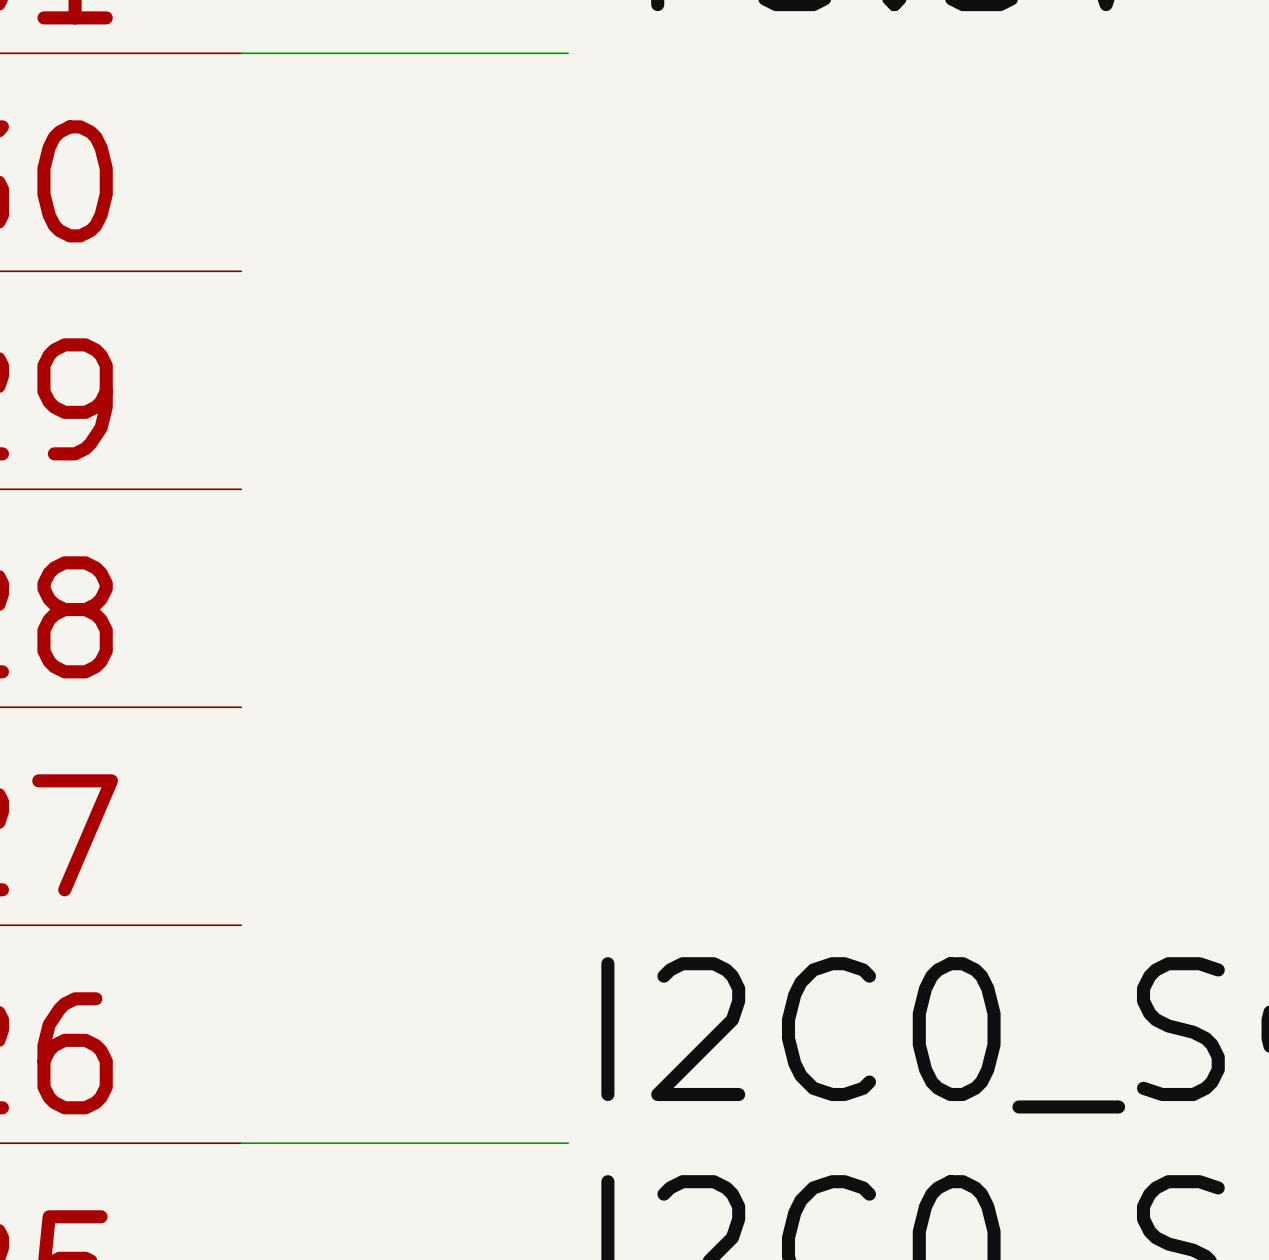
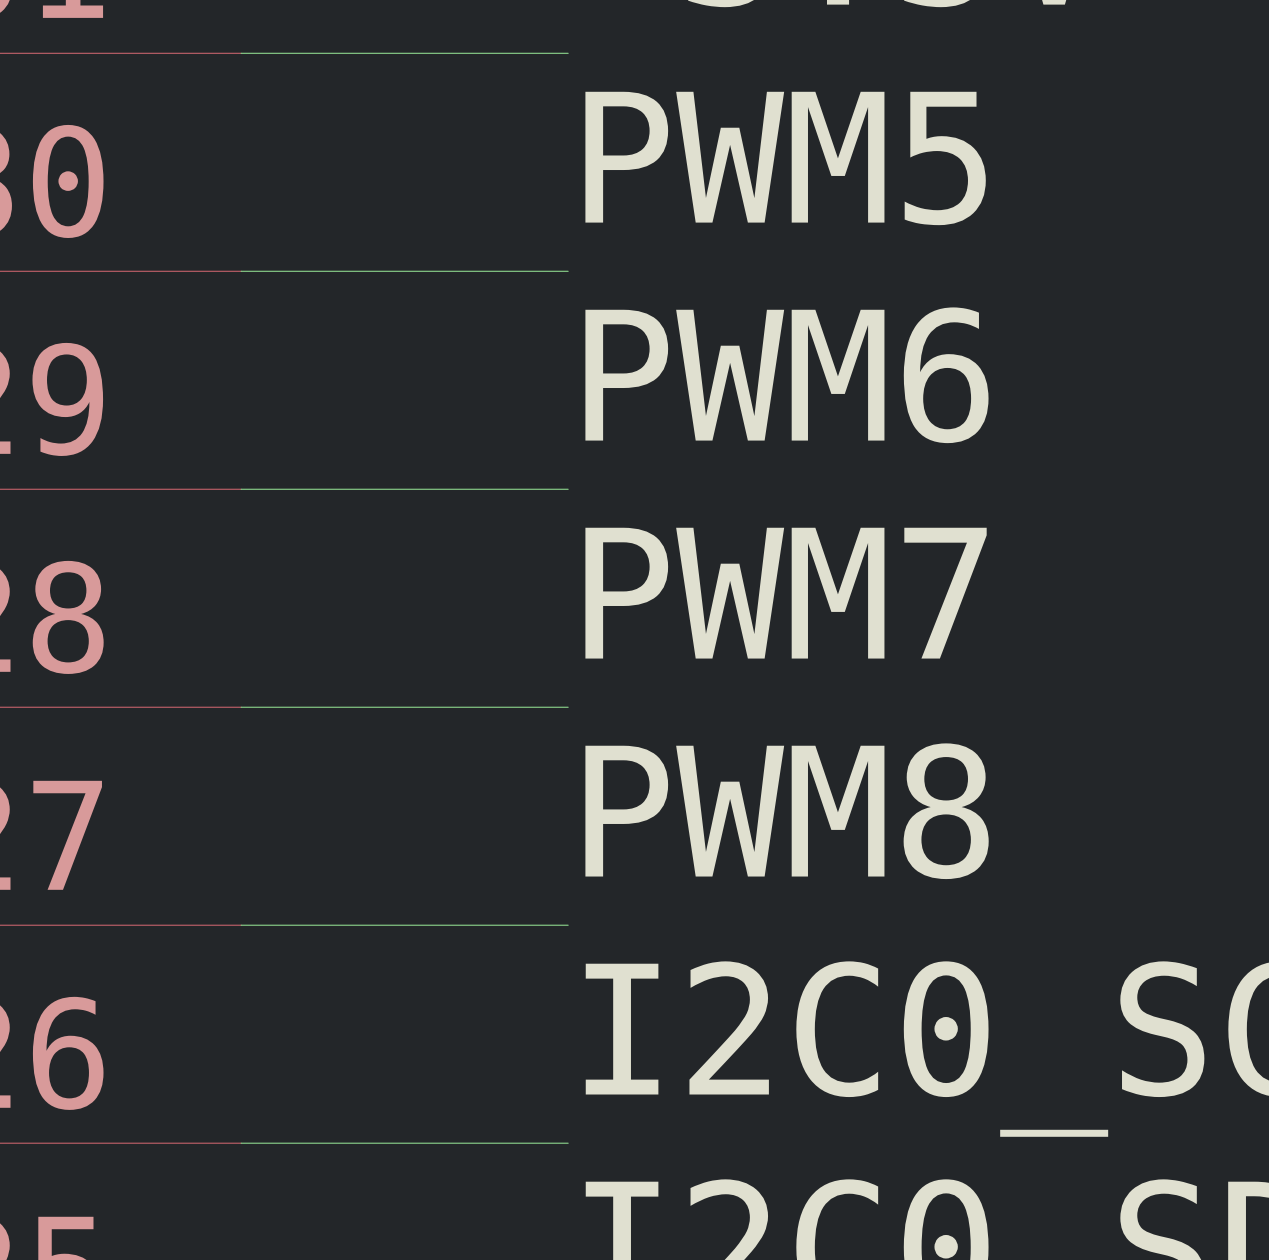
label: none -> PWM5 (785, 158)
wire: none -> (241, 271) (568, 271)
label: none -> PWM6 (786, 375)
wire: none -> (241, 489) (568, 489)
label: none -> PWM7 (786, 593)
wire: none -> (241, 707) (568, 707)
label: none -> PWM8 (787, 811)
wire: none -> (241, 925) (568, 925)

